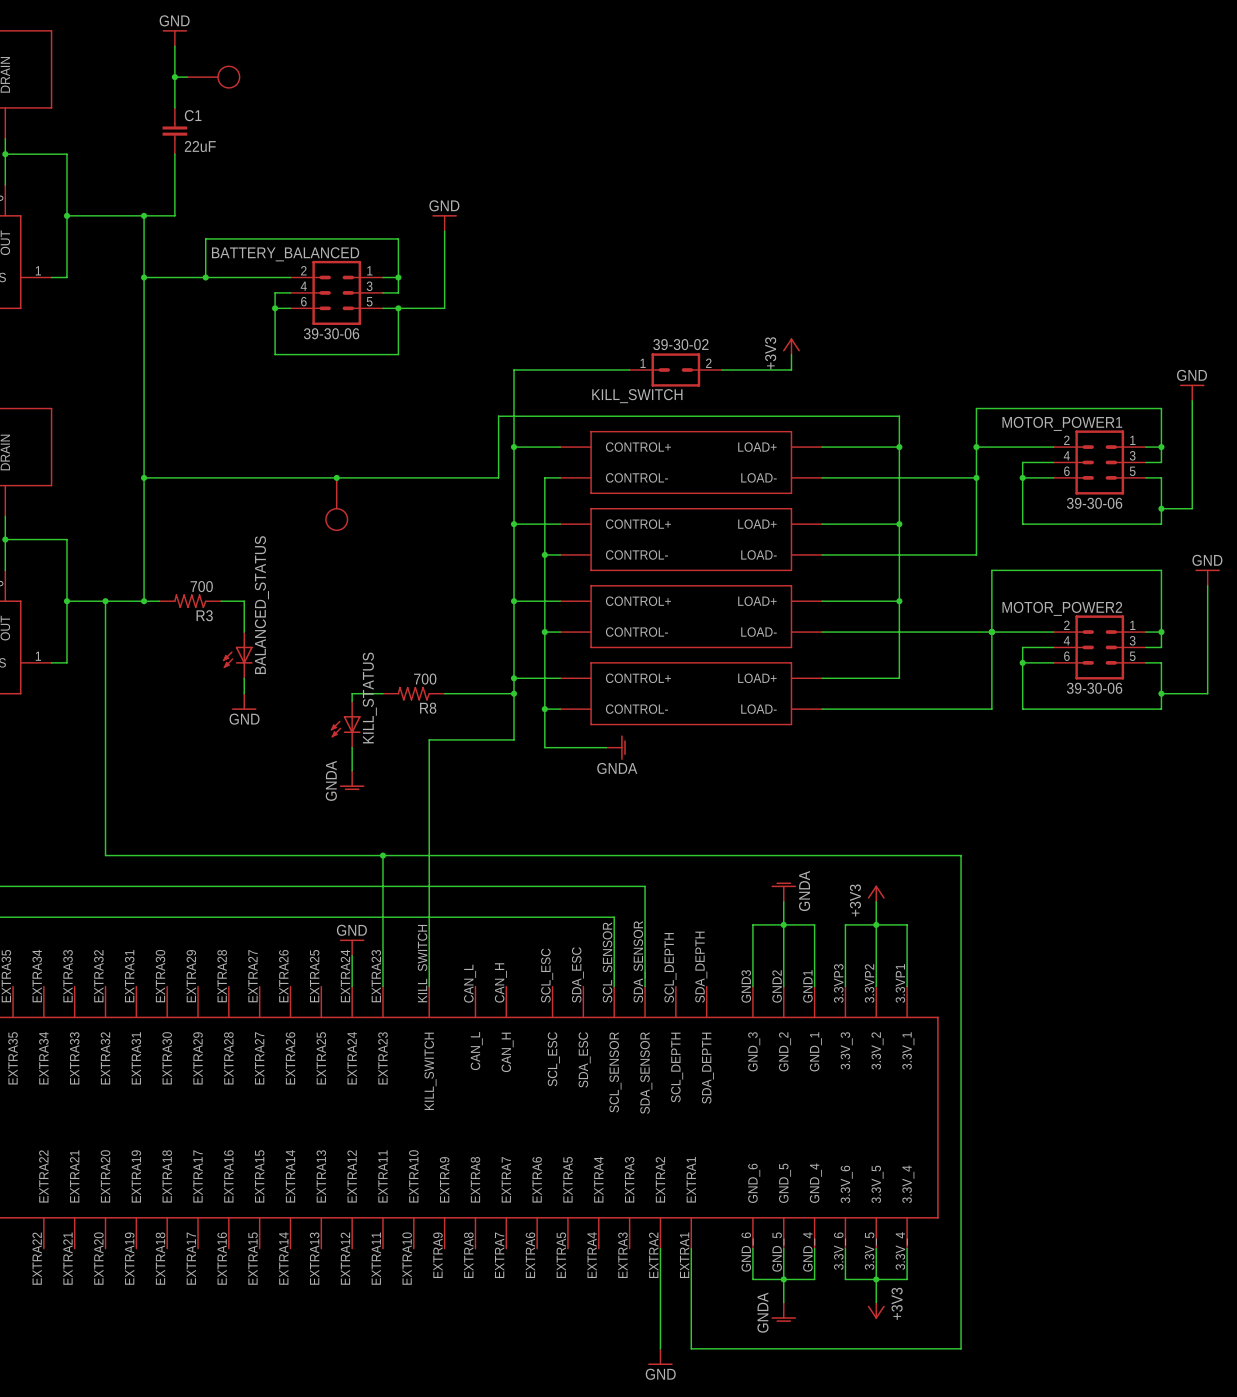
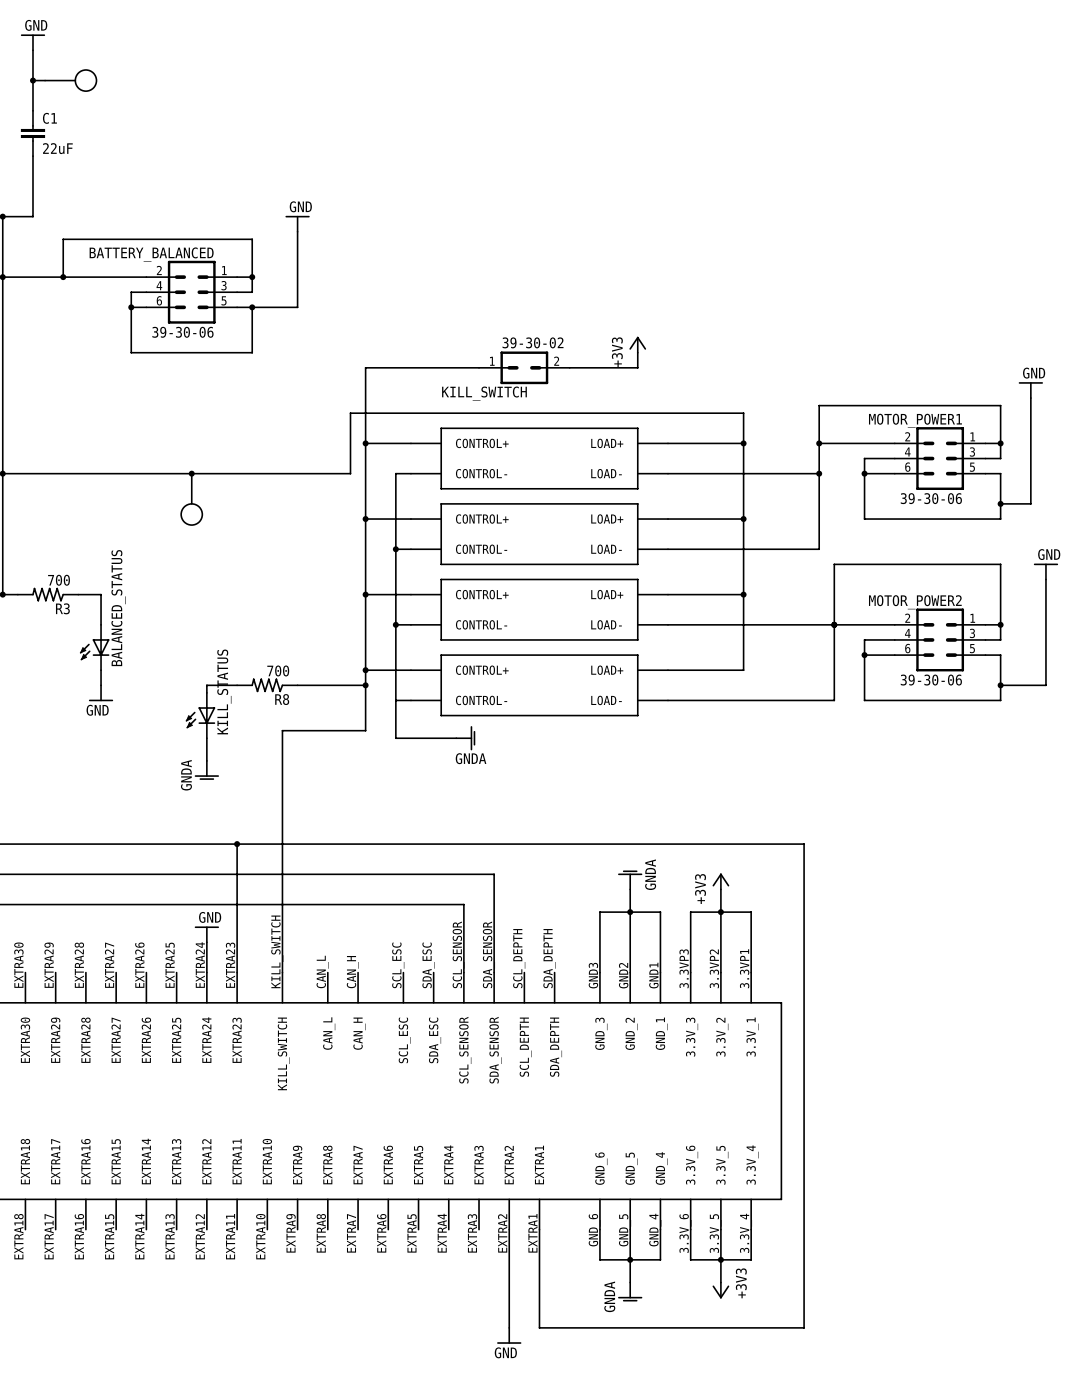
junction: (544, 709) -> none

